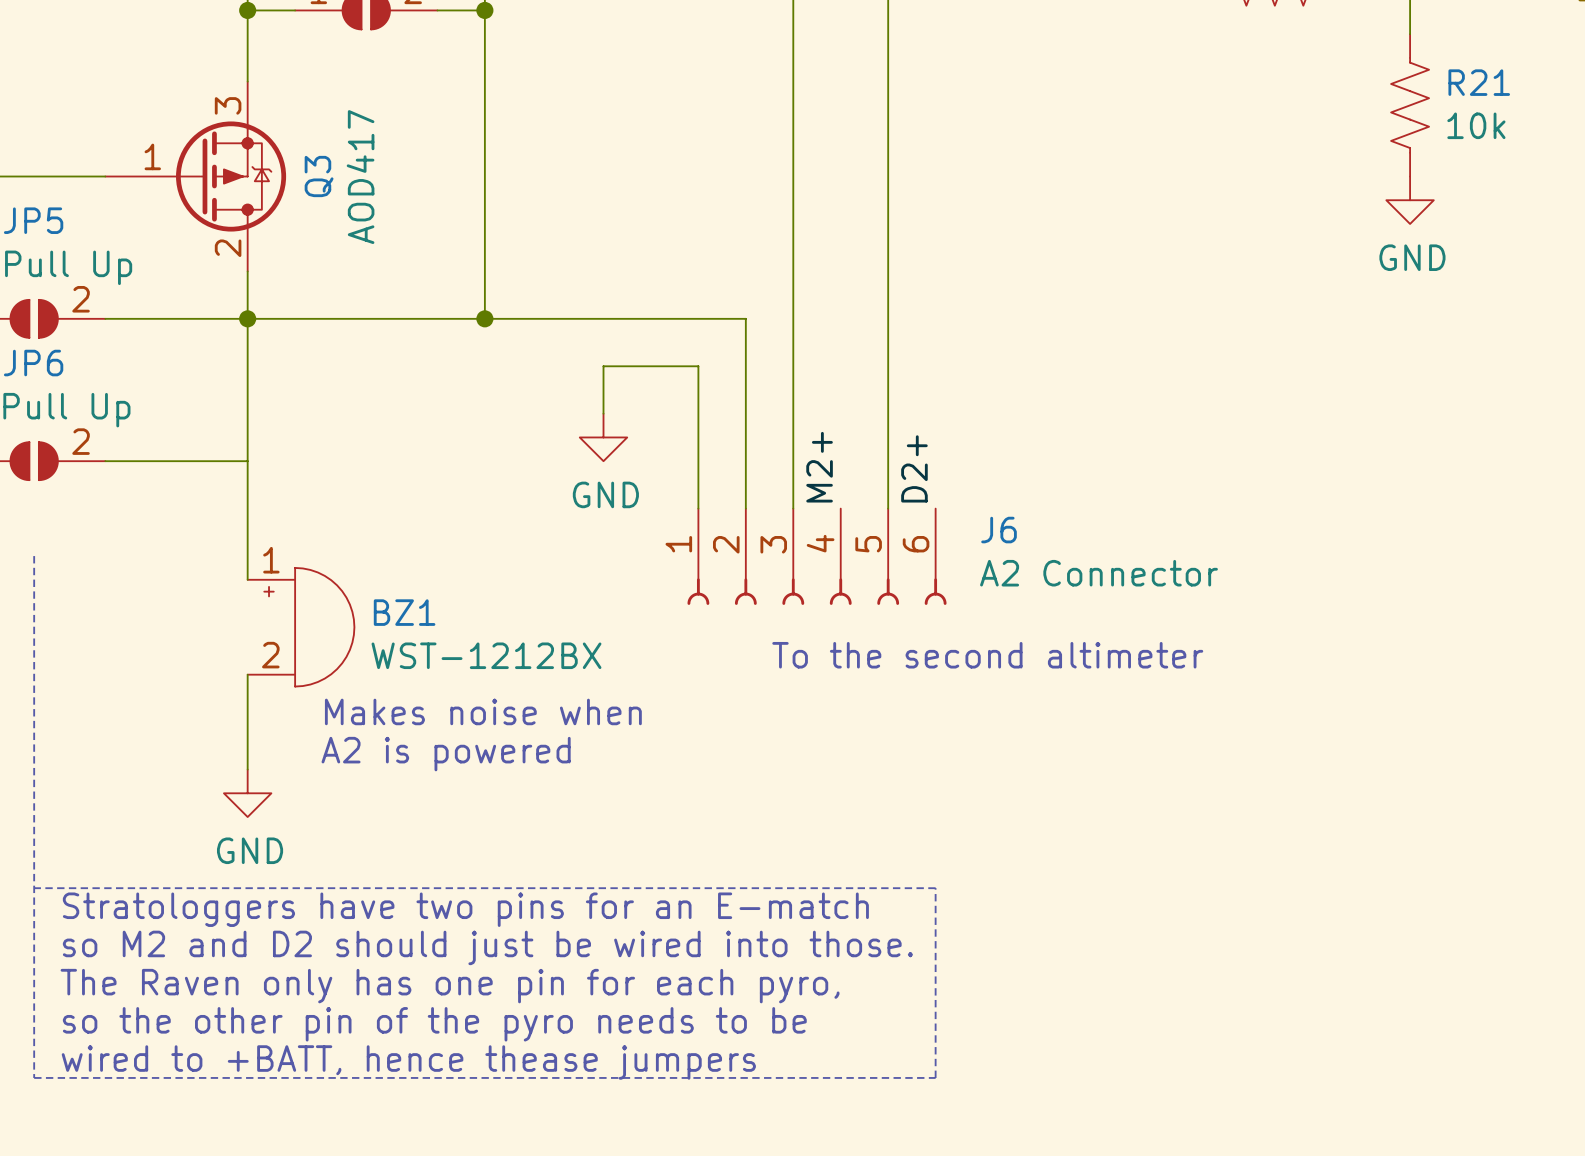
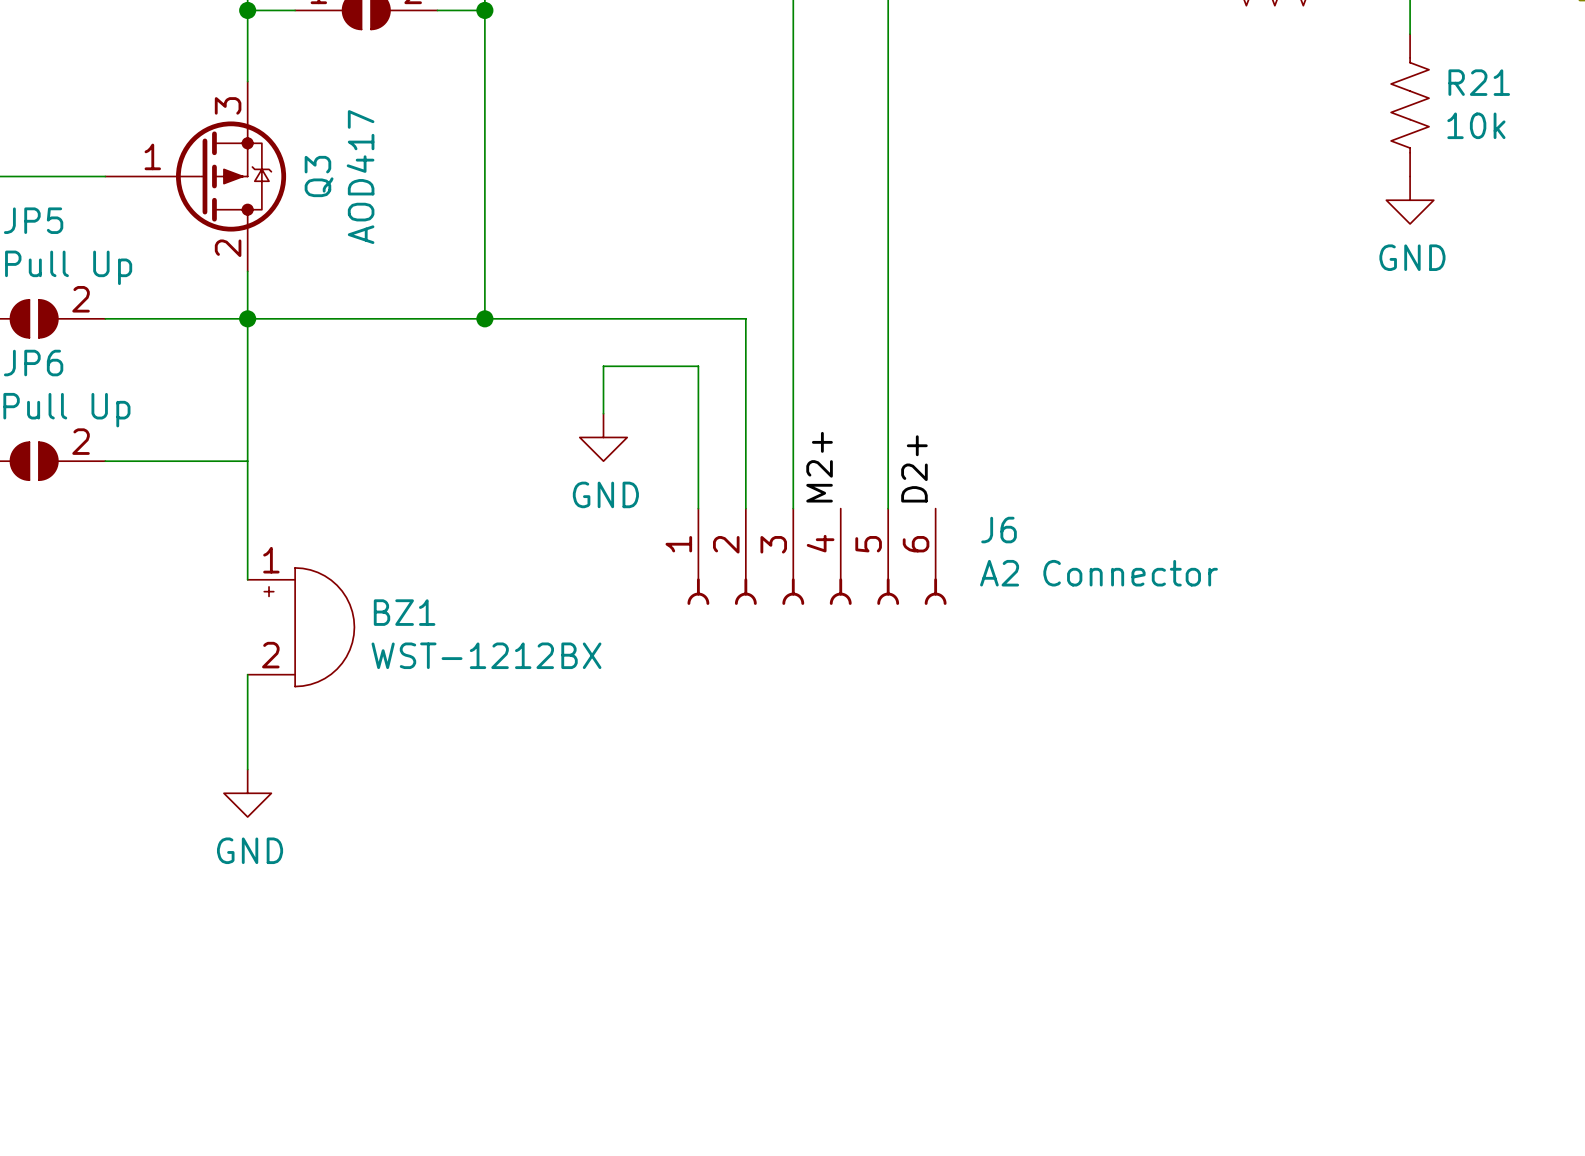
line: (34, 556) (34, 1077) (935, 1077) (935, 888) (34, 888) -> none
text: To the second altimeter (987, 655) -> none
text: Makes noise when (483, 711) -> none
text: A2 is powered (446, 754) -> none
text: Stratologgers have two pins for an E-match (465, 909) -> none
text: so M2 and D2 should just be wired into those. (487, 947) -> none
text: The Raven only has one pin for each pyro, (450, 986) -> none
text: so the other pin of the pyro needs to be (434, 1024) -> none
text: wired to +BATT, hence thease jumpers (408, 1062) -> none

